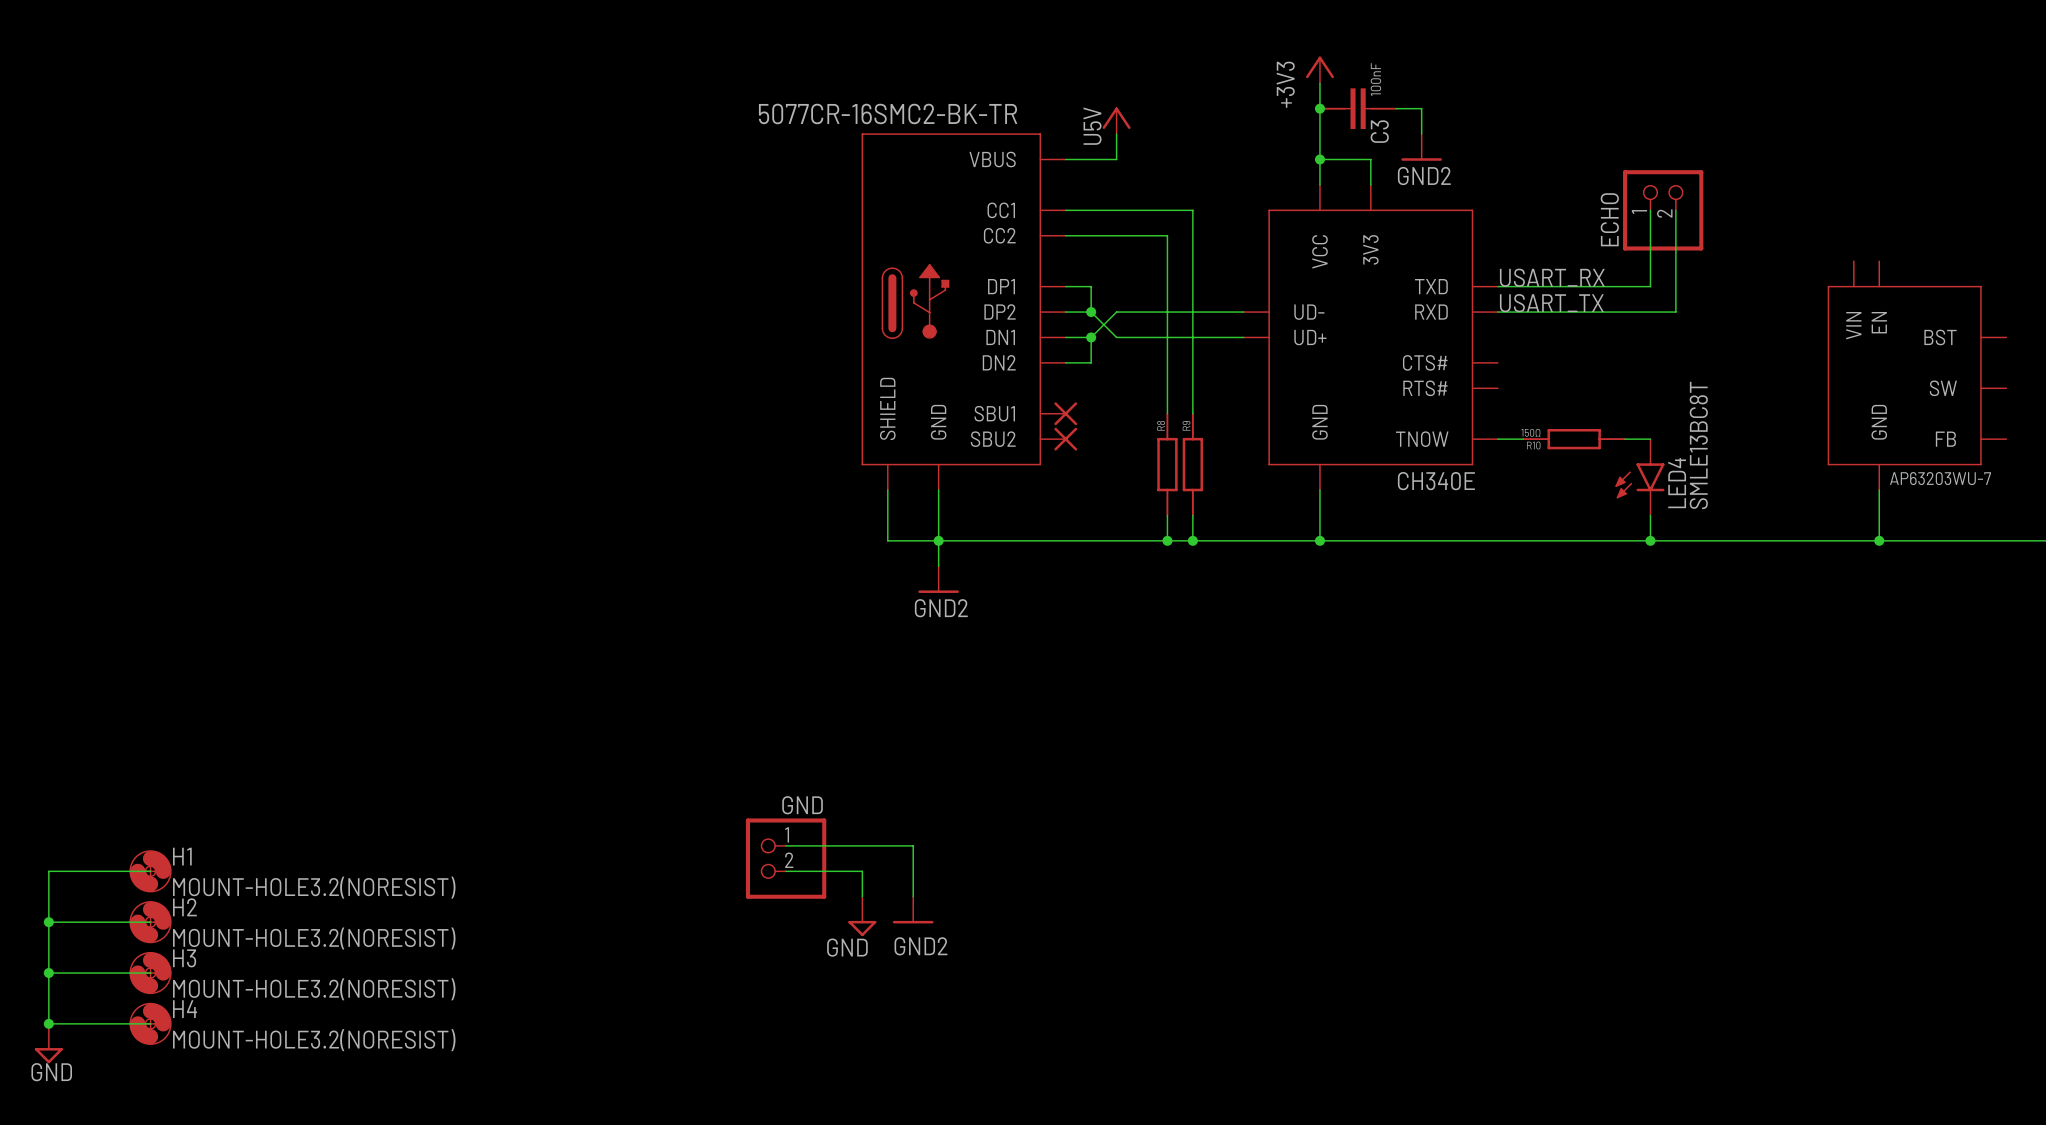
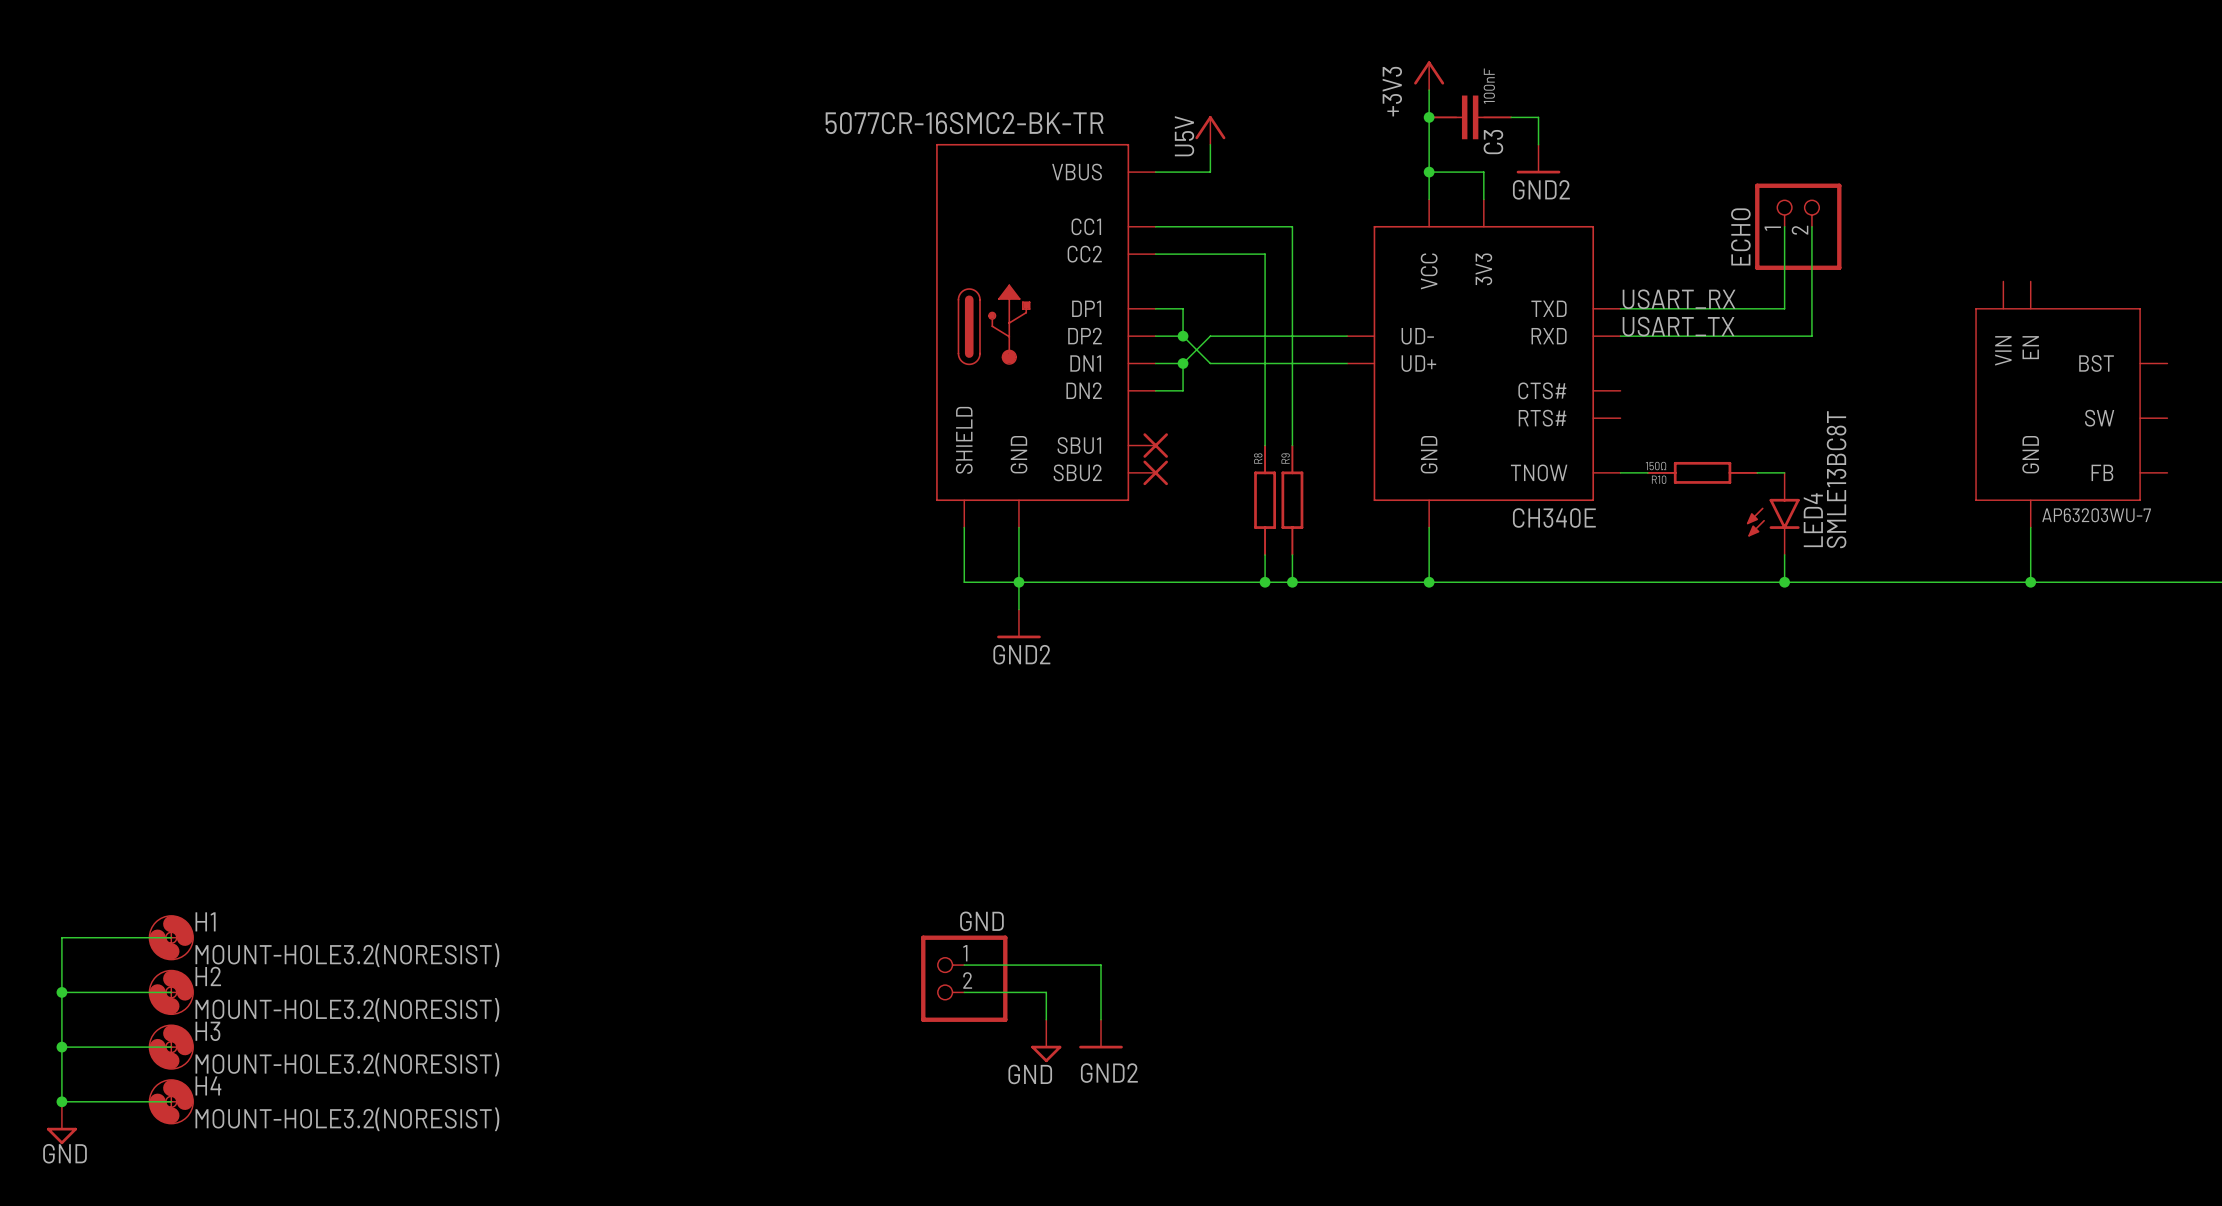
wire: (786, 845) (913, 845) (913, 896) -> (964, 965) (1101, 965) (1101, 1019)
GND position: (786, 858) -> (964, 978)
wire: (786, 871) (862, 871) (862, 896) -> (964, 992) (1046, 992) (1046, 1019)
power symbol position: (913, 910) -> (1101, 1034)
power symbol position: GND (862, 916) -> GND (1046, 1040)
label position: GND2 (920, 946) -> GND2 (1109, 1073)

